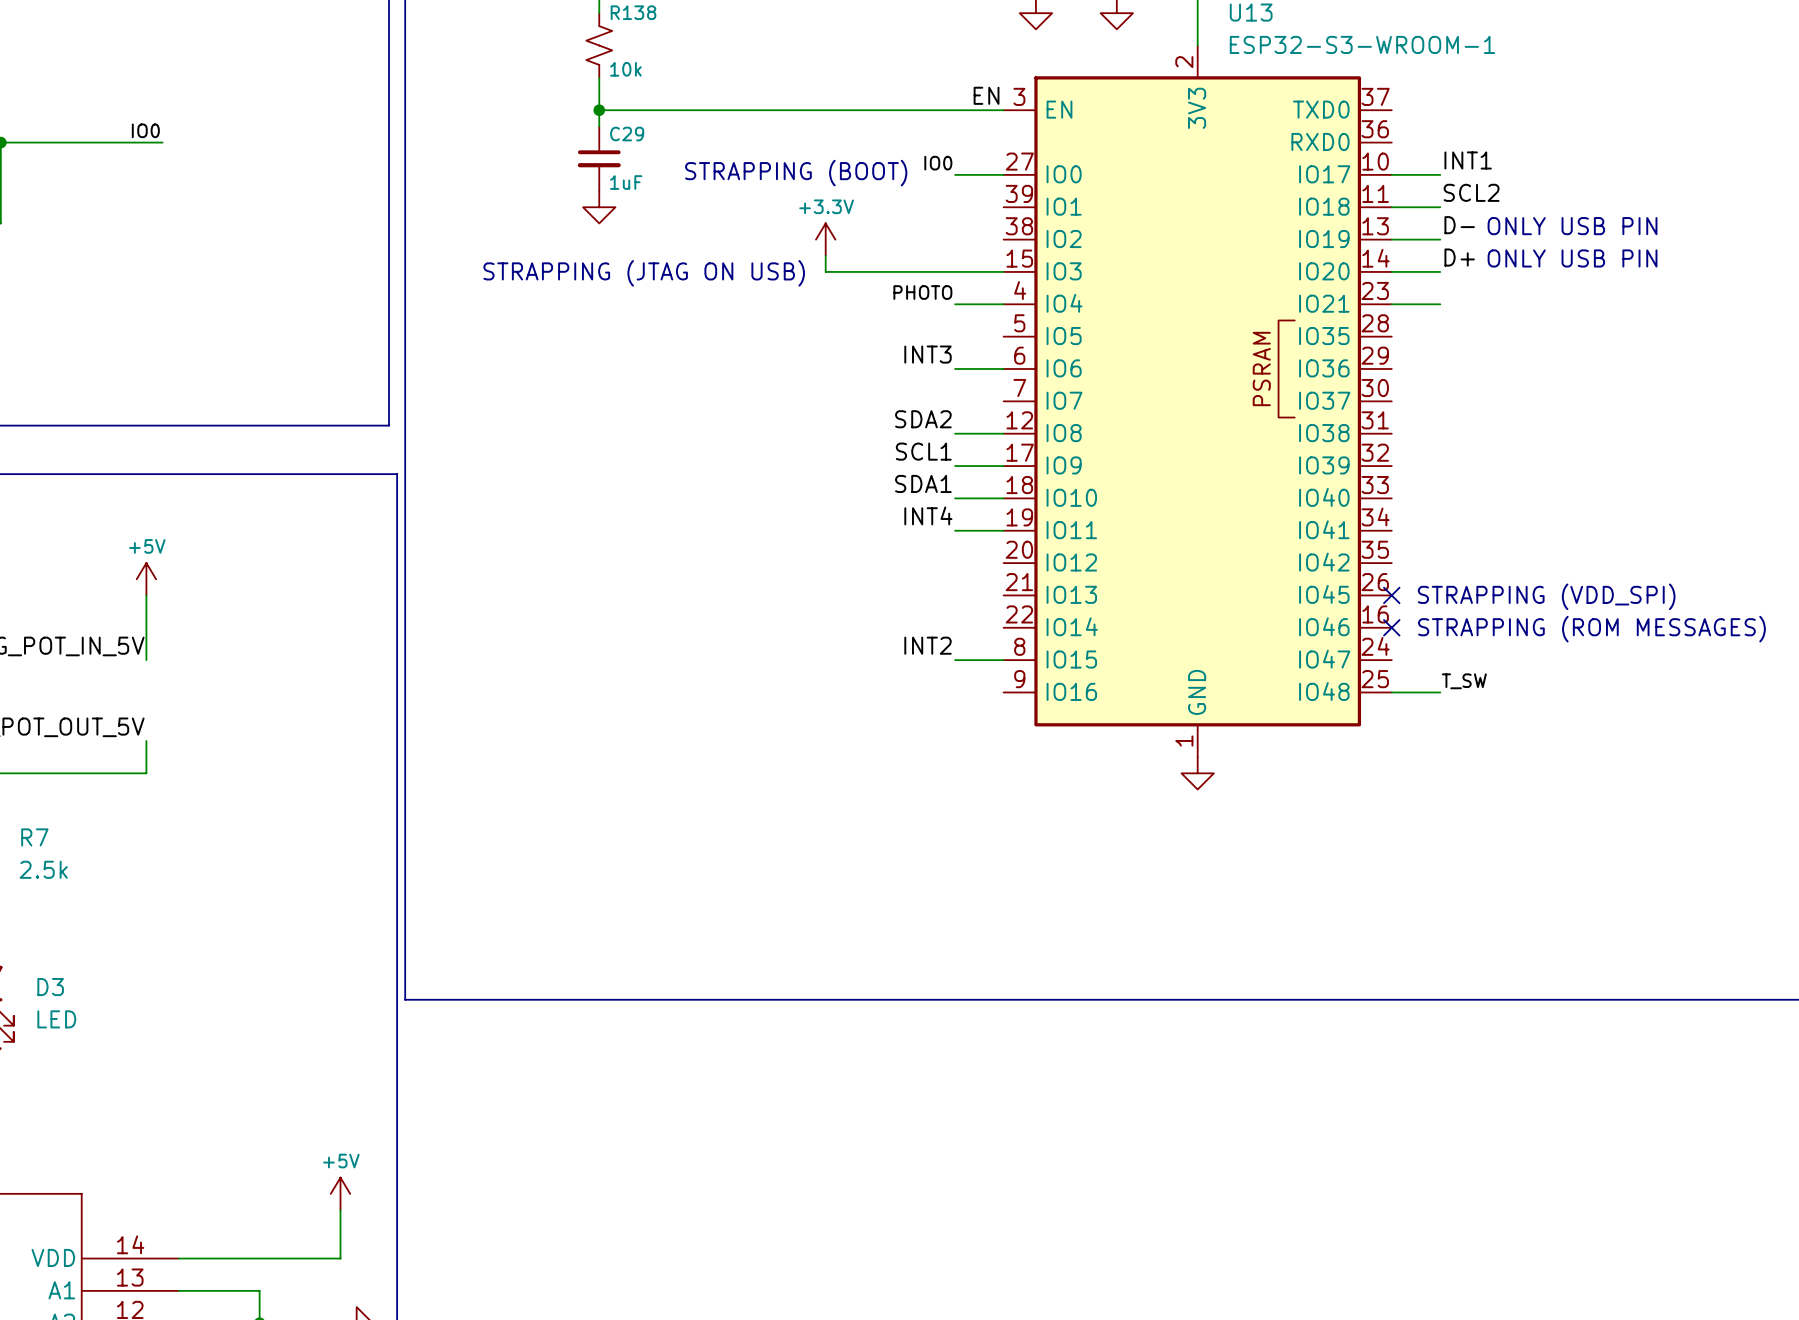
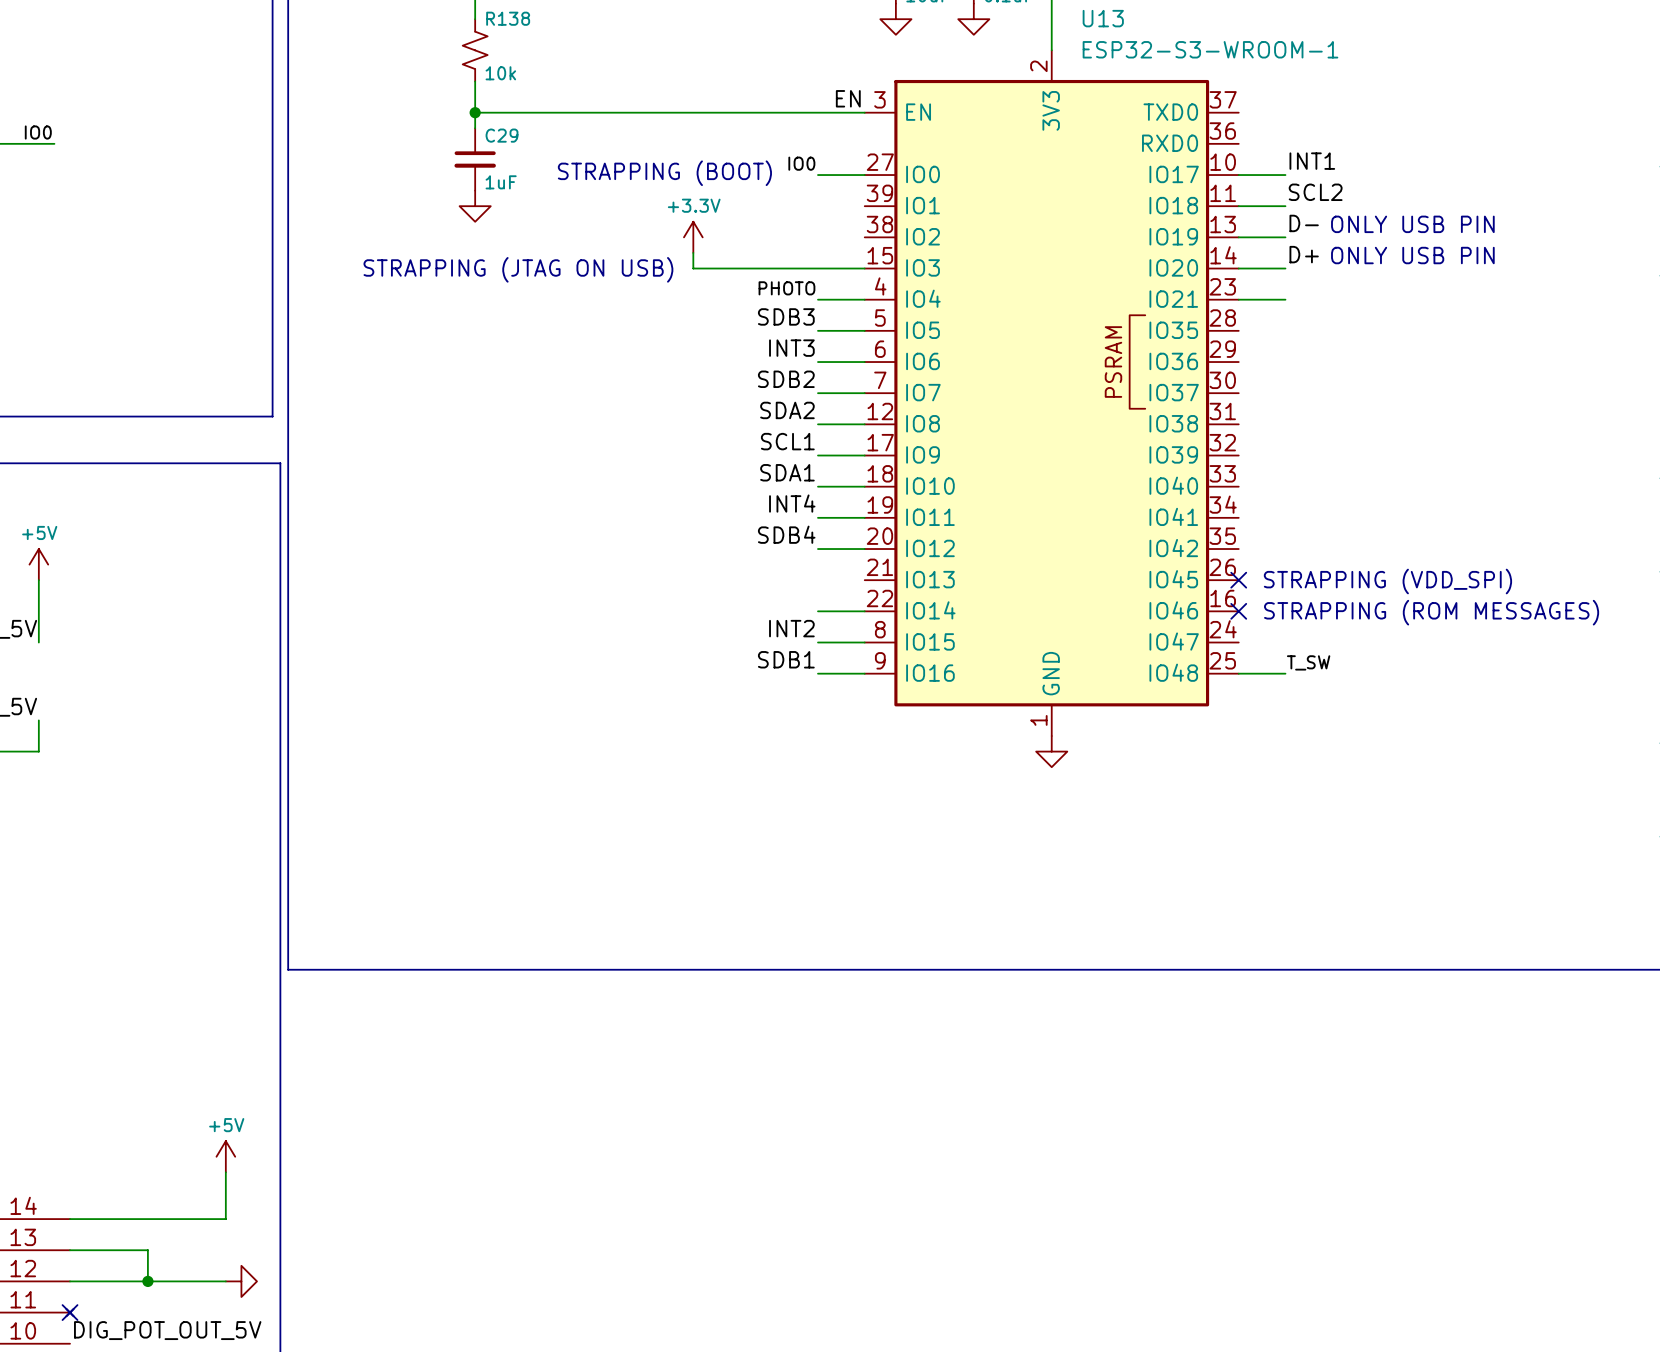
label: none -> SDB3 (786, 316)
wire: none -> (817, 330) (864, 330)
label: none -> SDB2 (786, 379)
wire: none -> (817, 393) (864, 393)
label: none -> SDB4 (786, 534)
wire: none -> (817, 549) (864, 549)
wire: none -> (817, 611) (864, 611)
label: none -> SDB1 (786, 659)
wire: none -> (817, 673) (864, 673)

